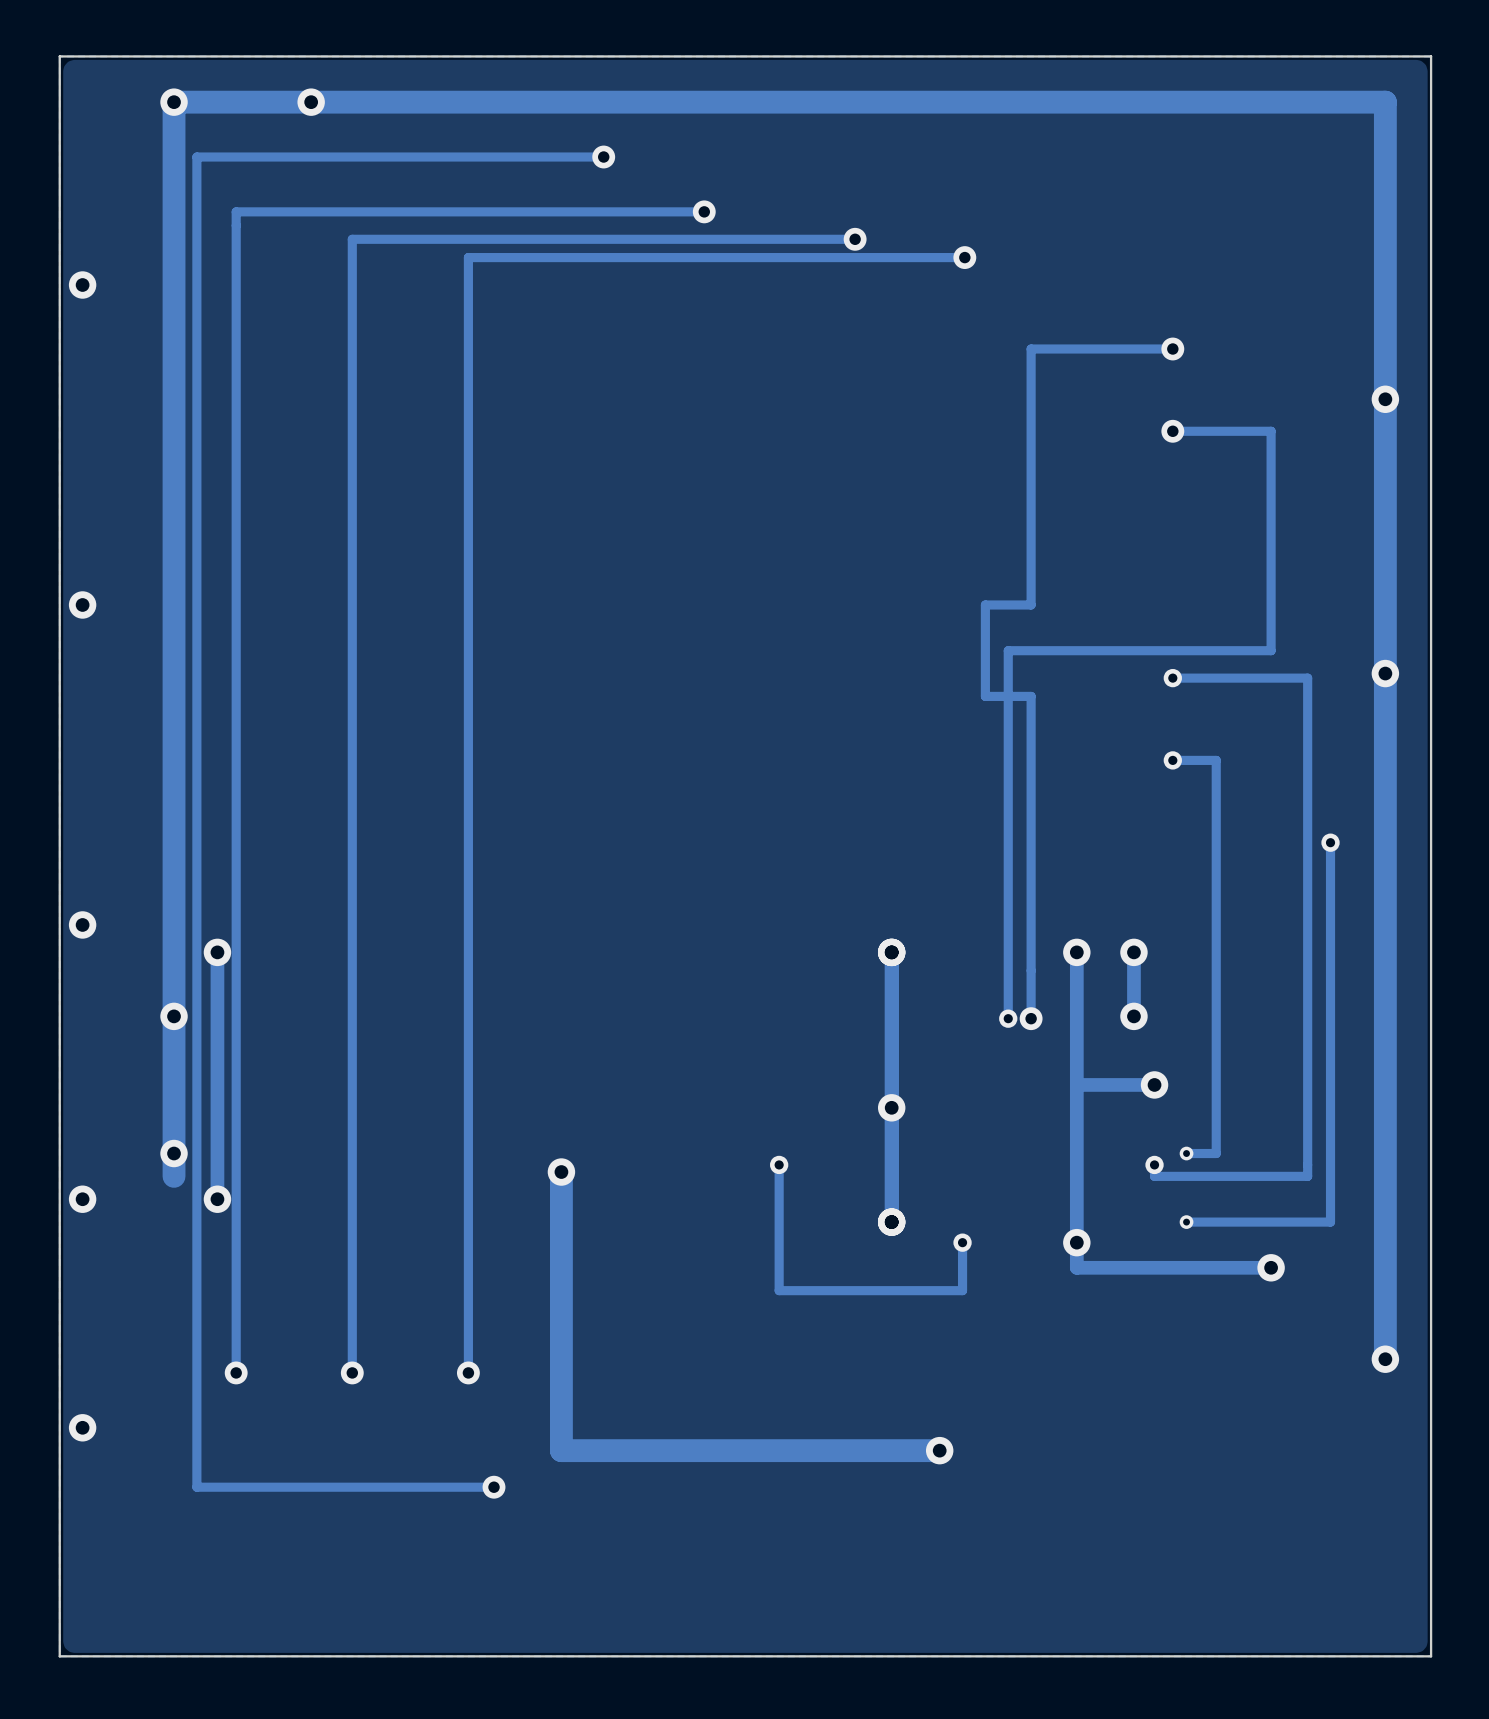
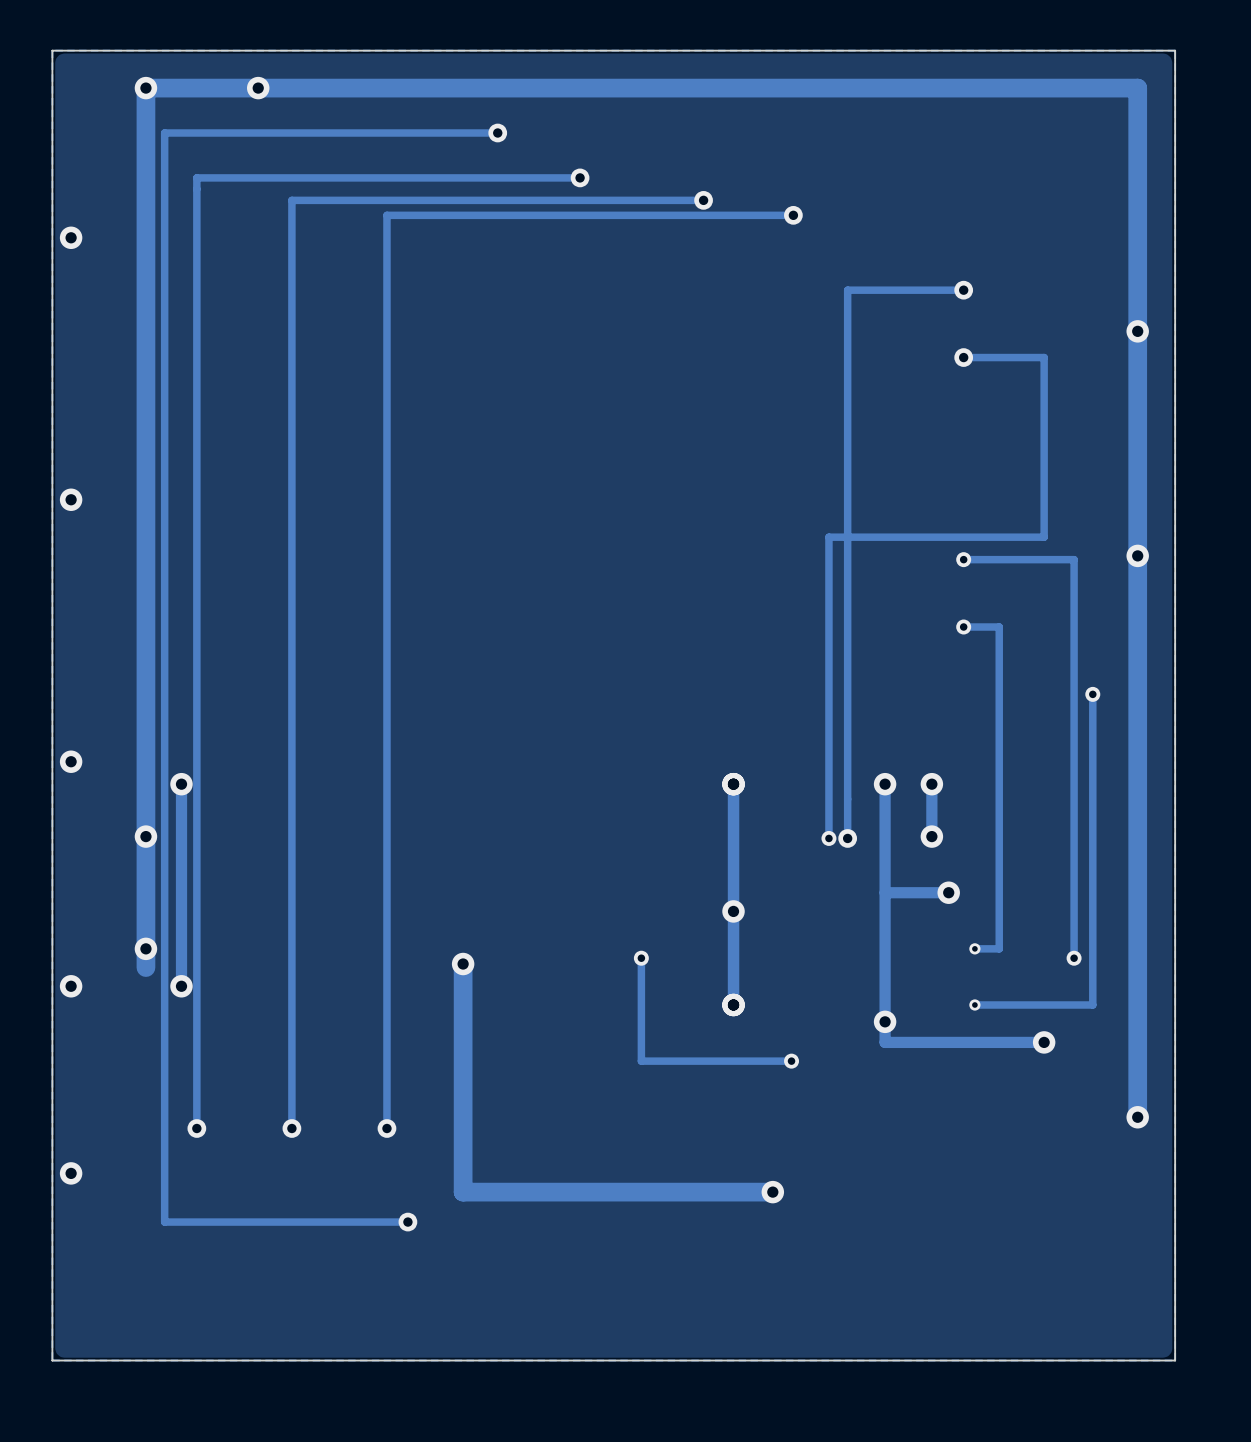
track: (1031, 604) (985, 604) (985, 696) (1031, 696) -> (847, 499) (847, 574)
via: (1154, 1164) -> none
track: (1307, 1164) (1307, 1176) (1154, 1176) (1154, 1164) -> none
via: none -> (1074, 958)
track: (962, 1242) (962, 1290) -> none
via position: (962, 1242) -> (791, 1061)

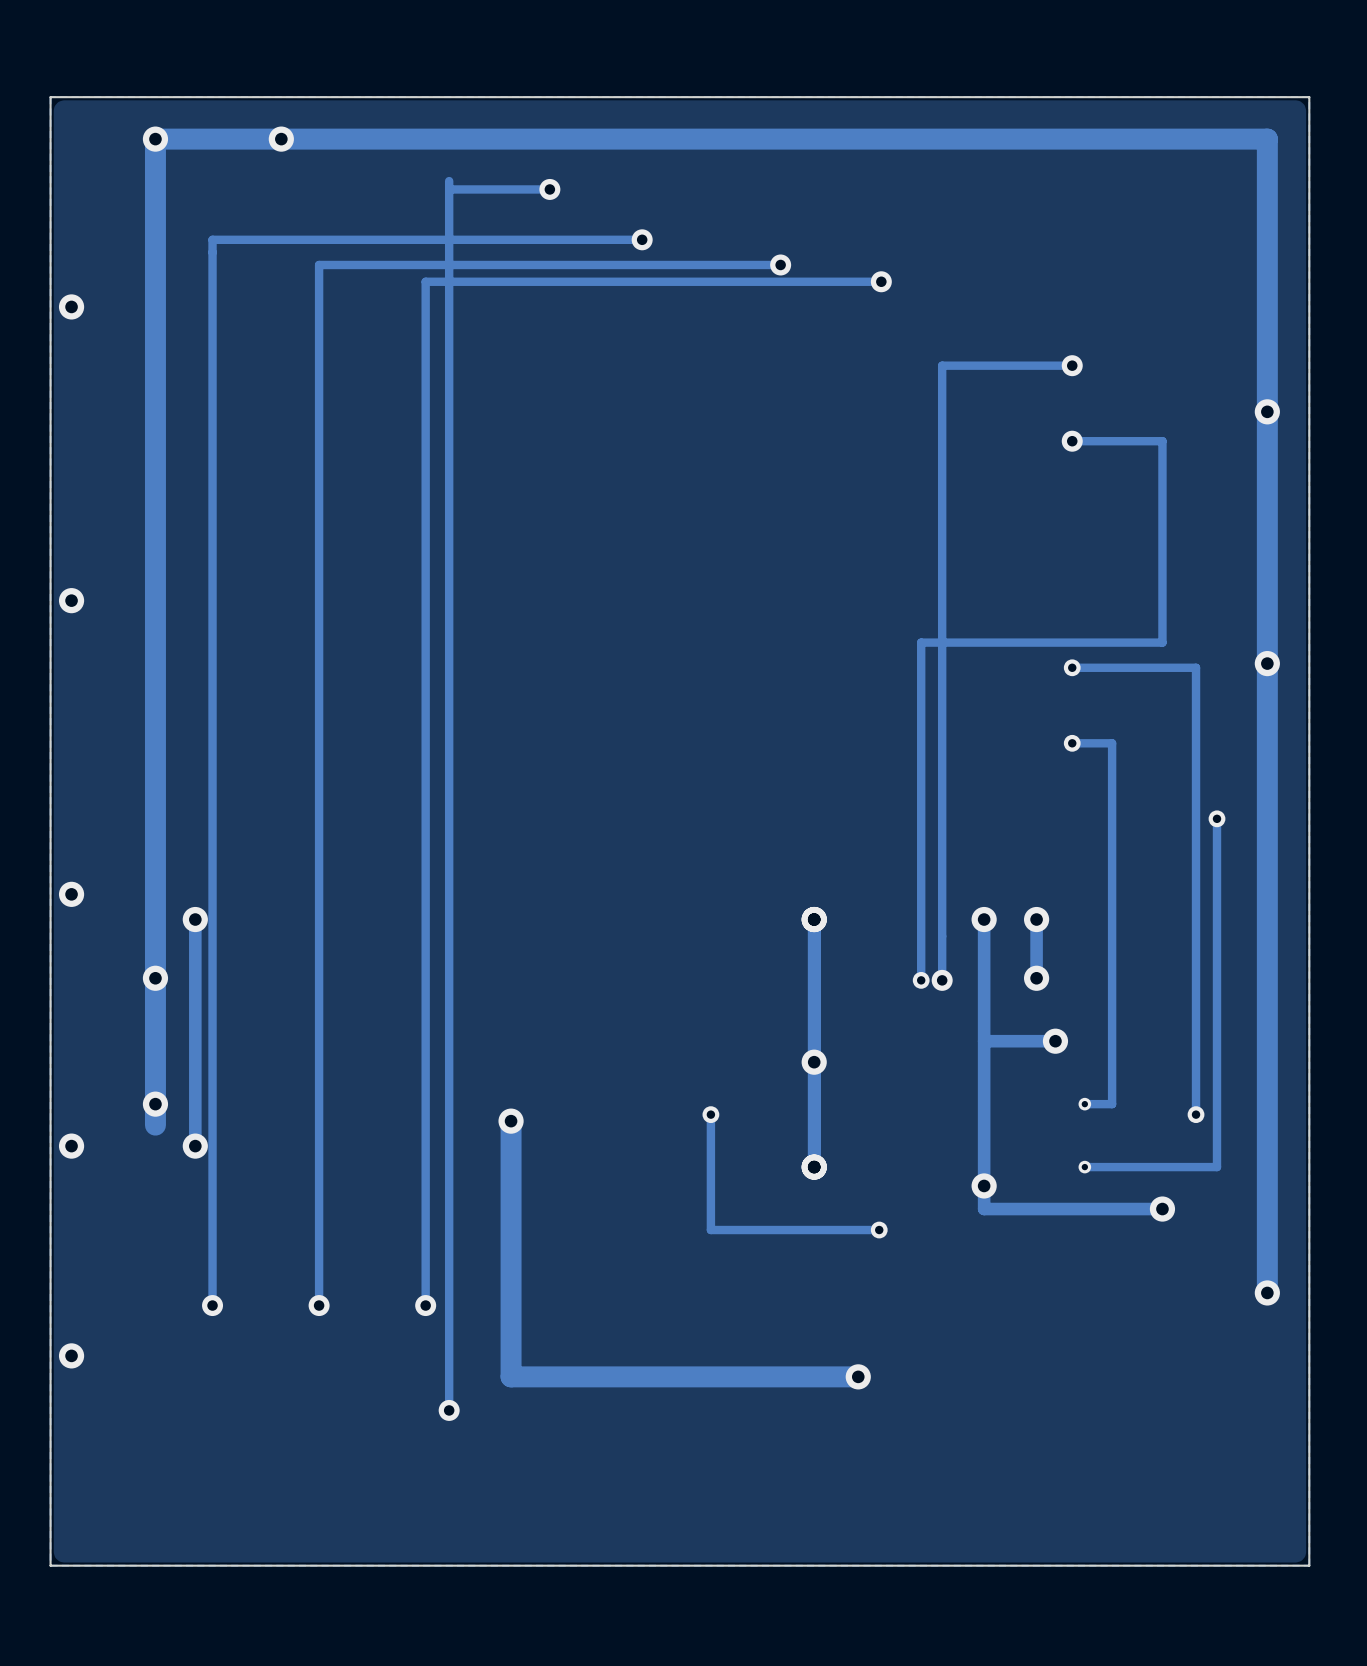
track: (407, 133) (164, 133) (164, 1222) (407, 1222) -> (449, 181) (449, 1410)

